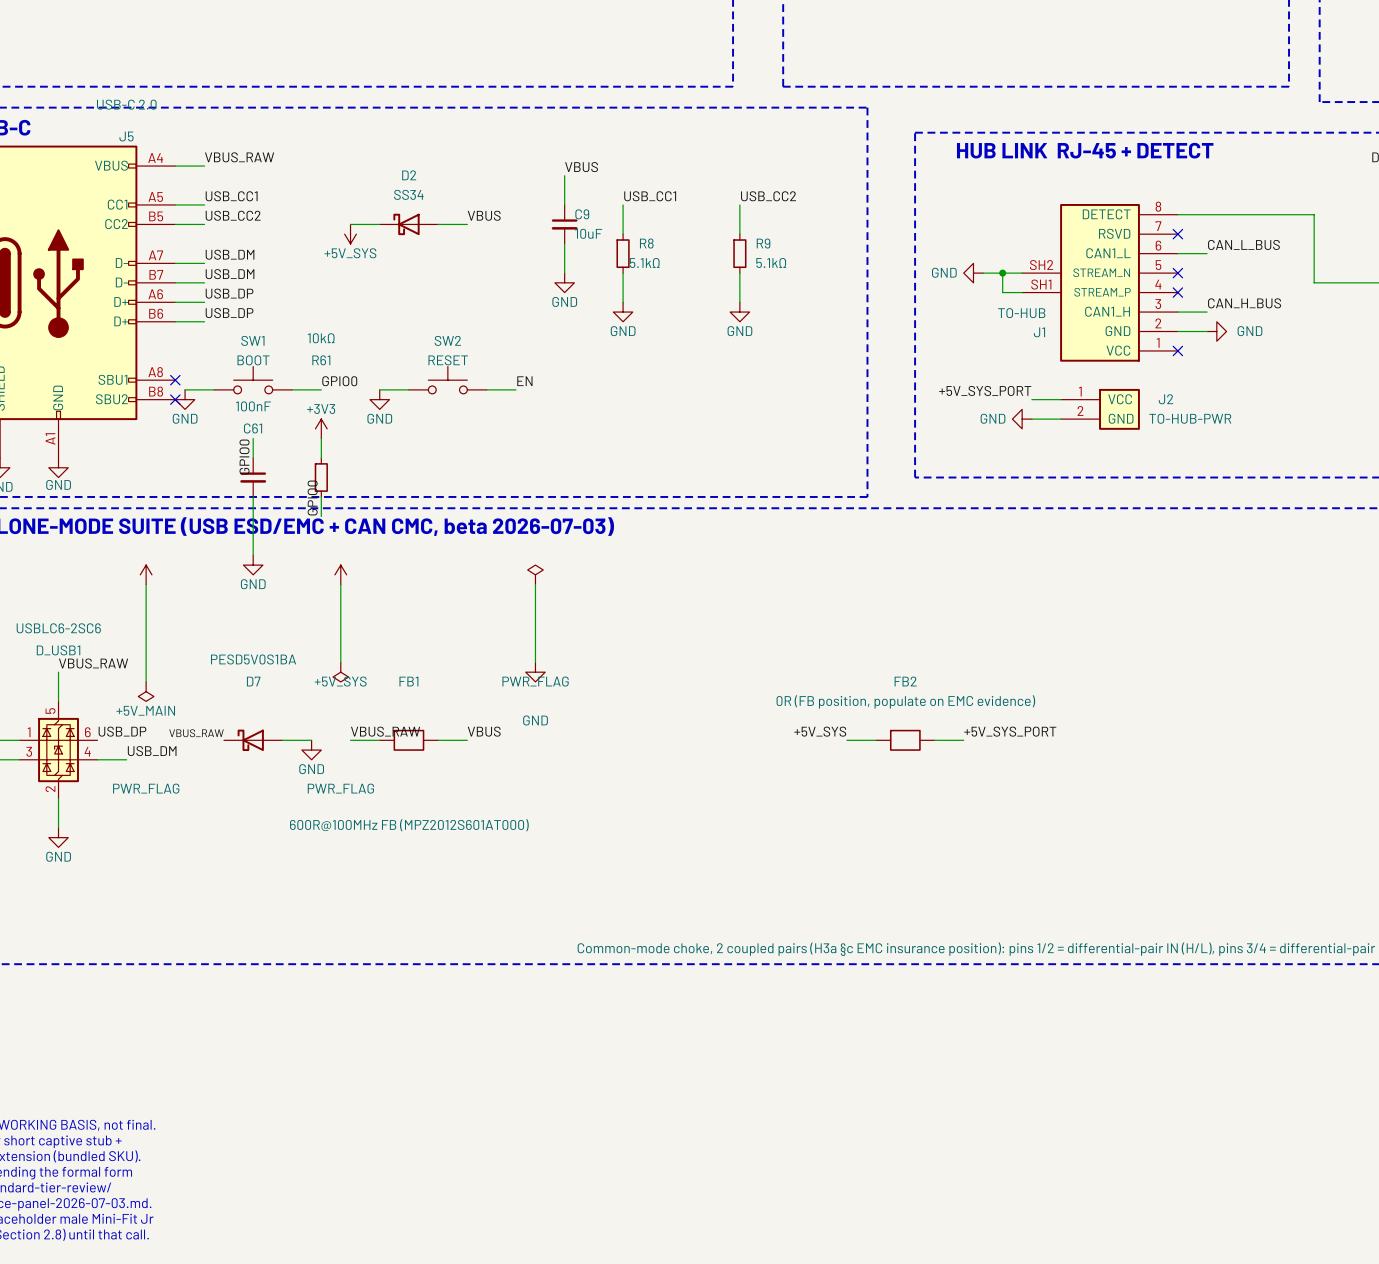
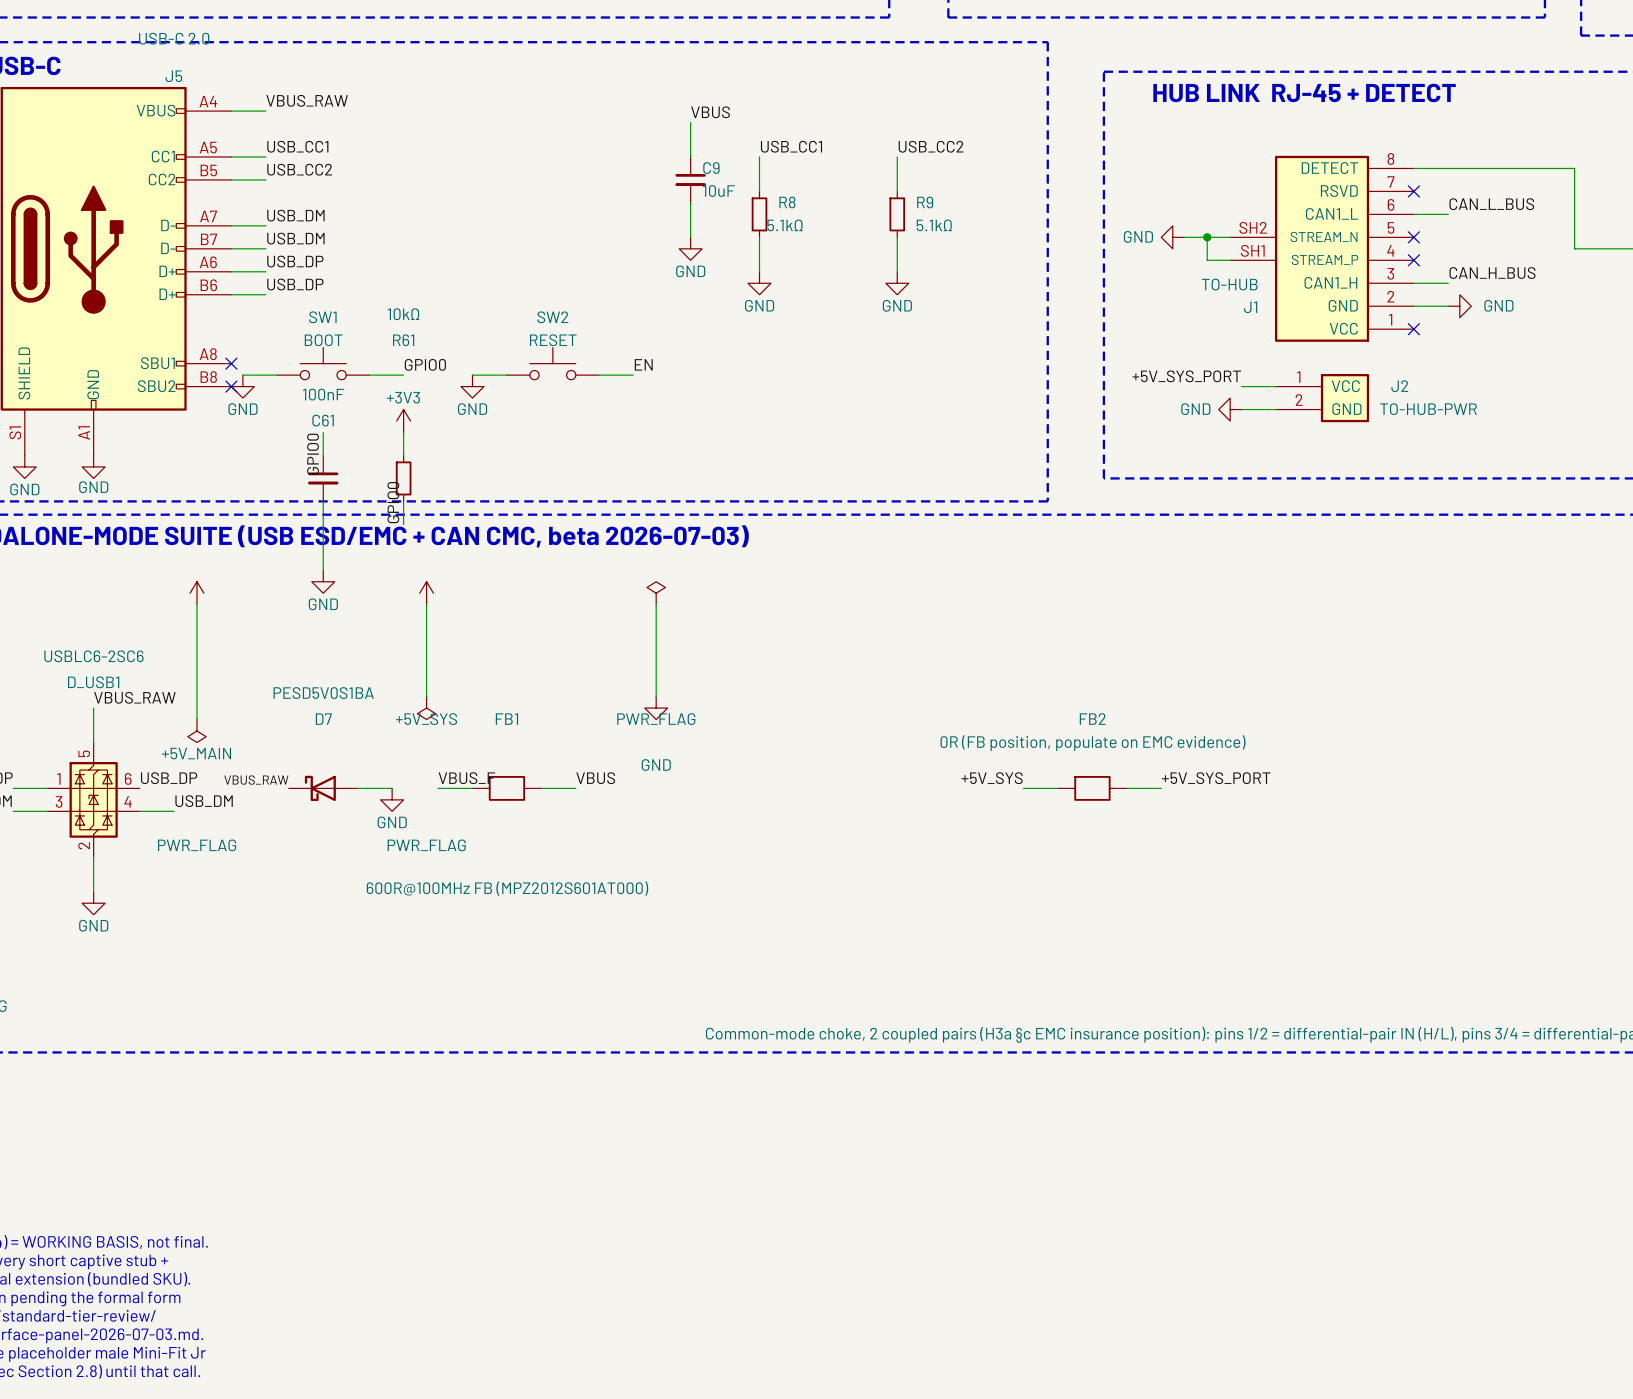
label: VBUS (484, 215) -> none
wire: (350, 224) (379, 224) -> none
D2: SS34 (408, 224) -> none
wire: (438, 224) (467, 224) -> none
power symbol: +5V_SYS (350, 234) -> none
label: VBUS_RAW (385, 731) -> VBUS_F (466, 778)

